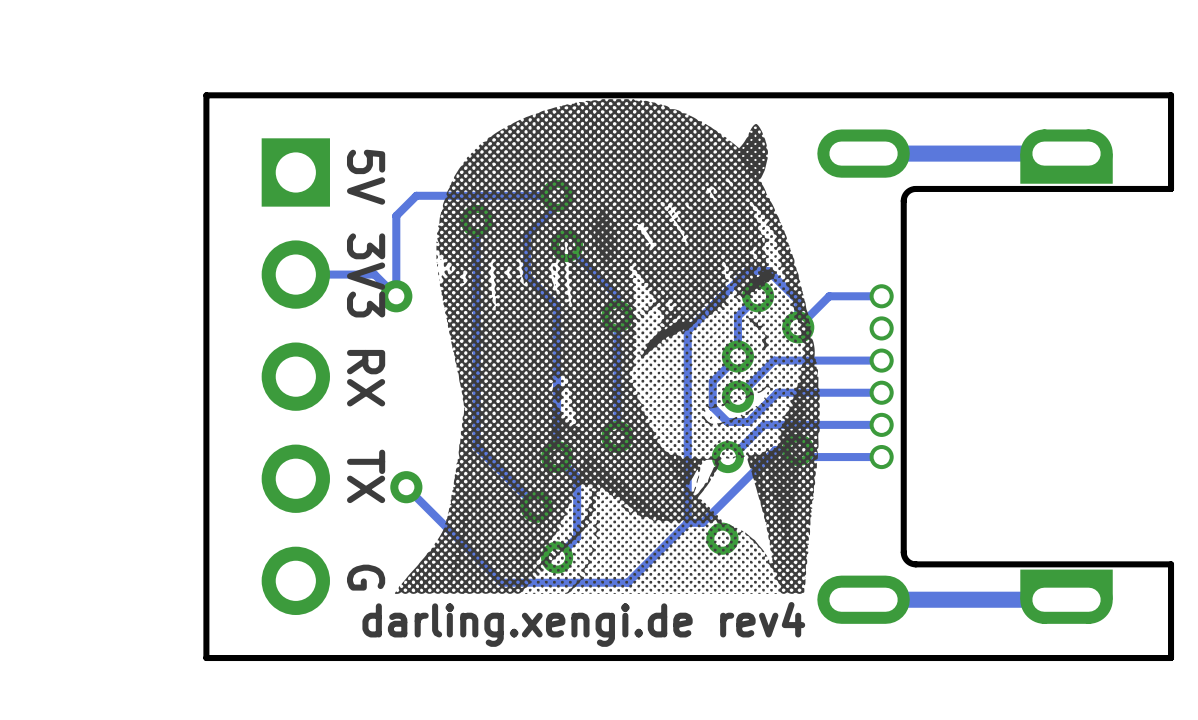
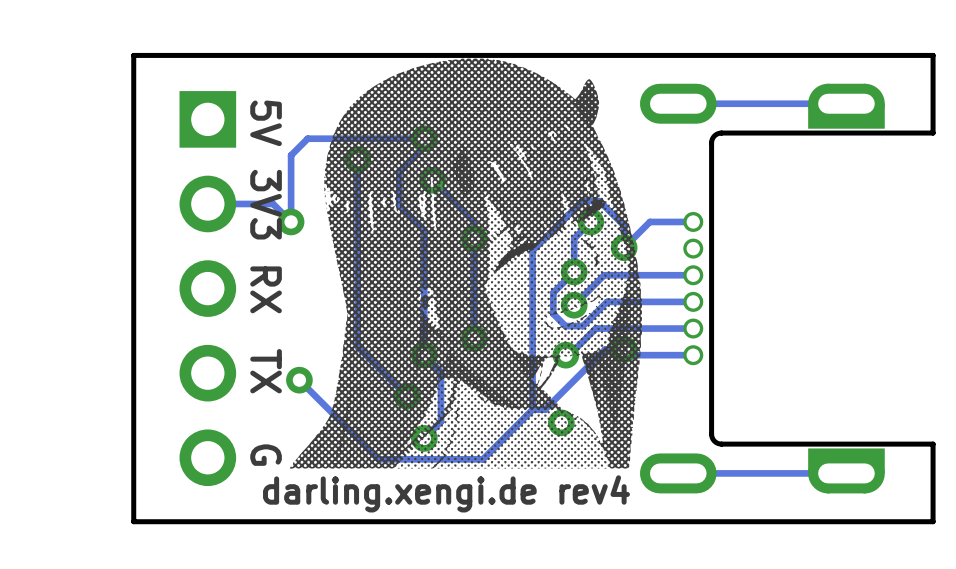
track width: thick (1066, 153) (863, 153) -> thin (846, 103) (678, 103)
track width: thick (1066, 599) (863, 599) -> thin (846, 473) (678, 473)

